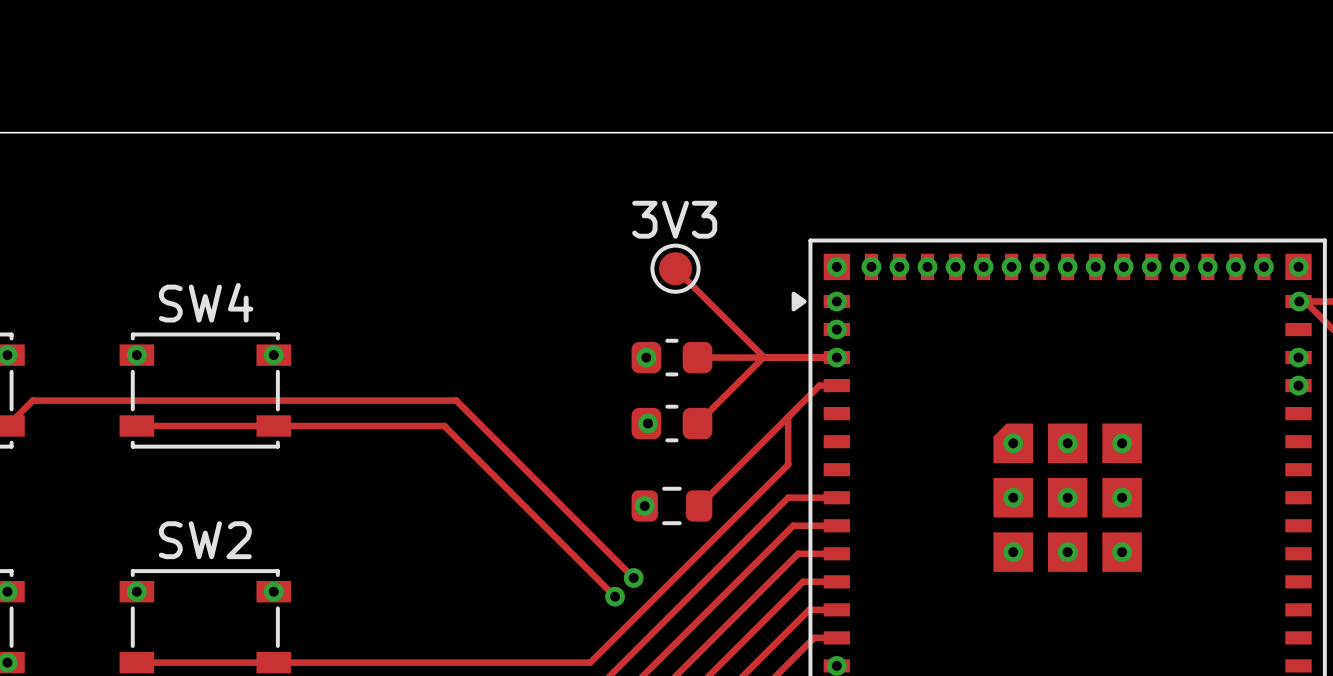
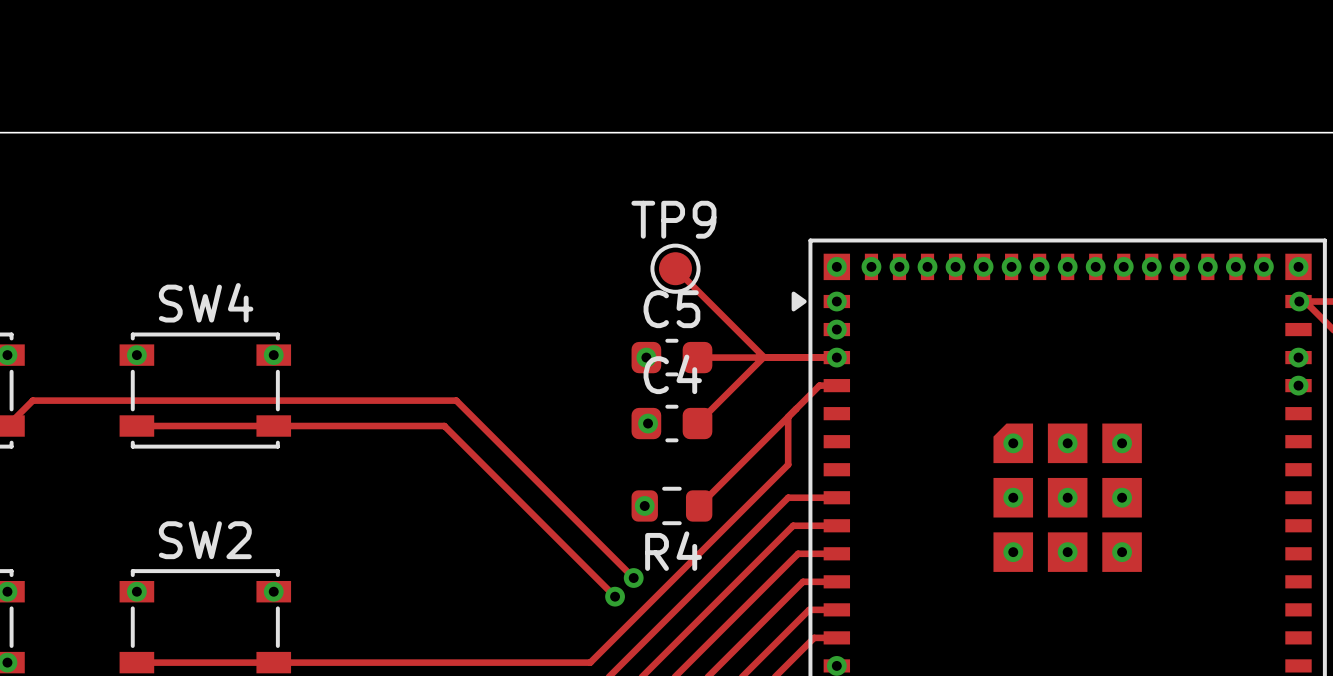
3V3 name: 3V3 (674, 219) -> TP9 (673, 219)
C5 name: none -> C5 (671, 309)
C4 name: none -> C4 (672, 374)
R4 name: none -> R4 (673, 551)

